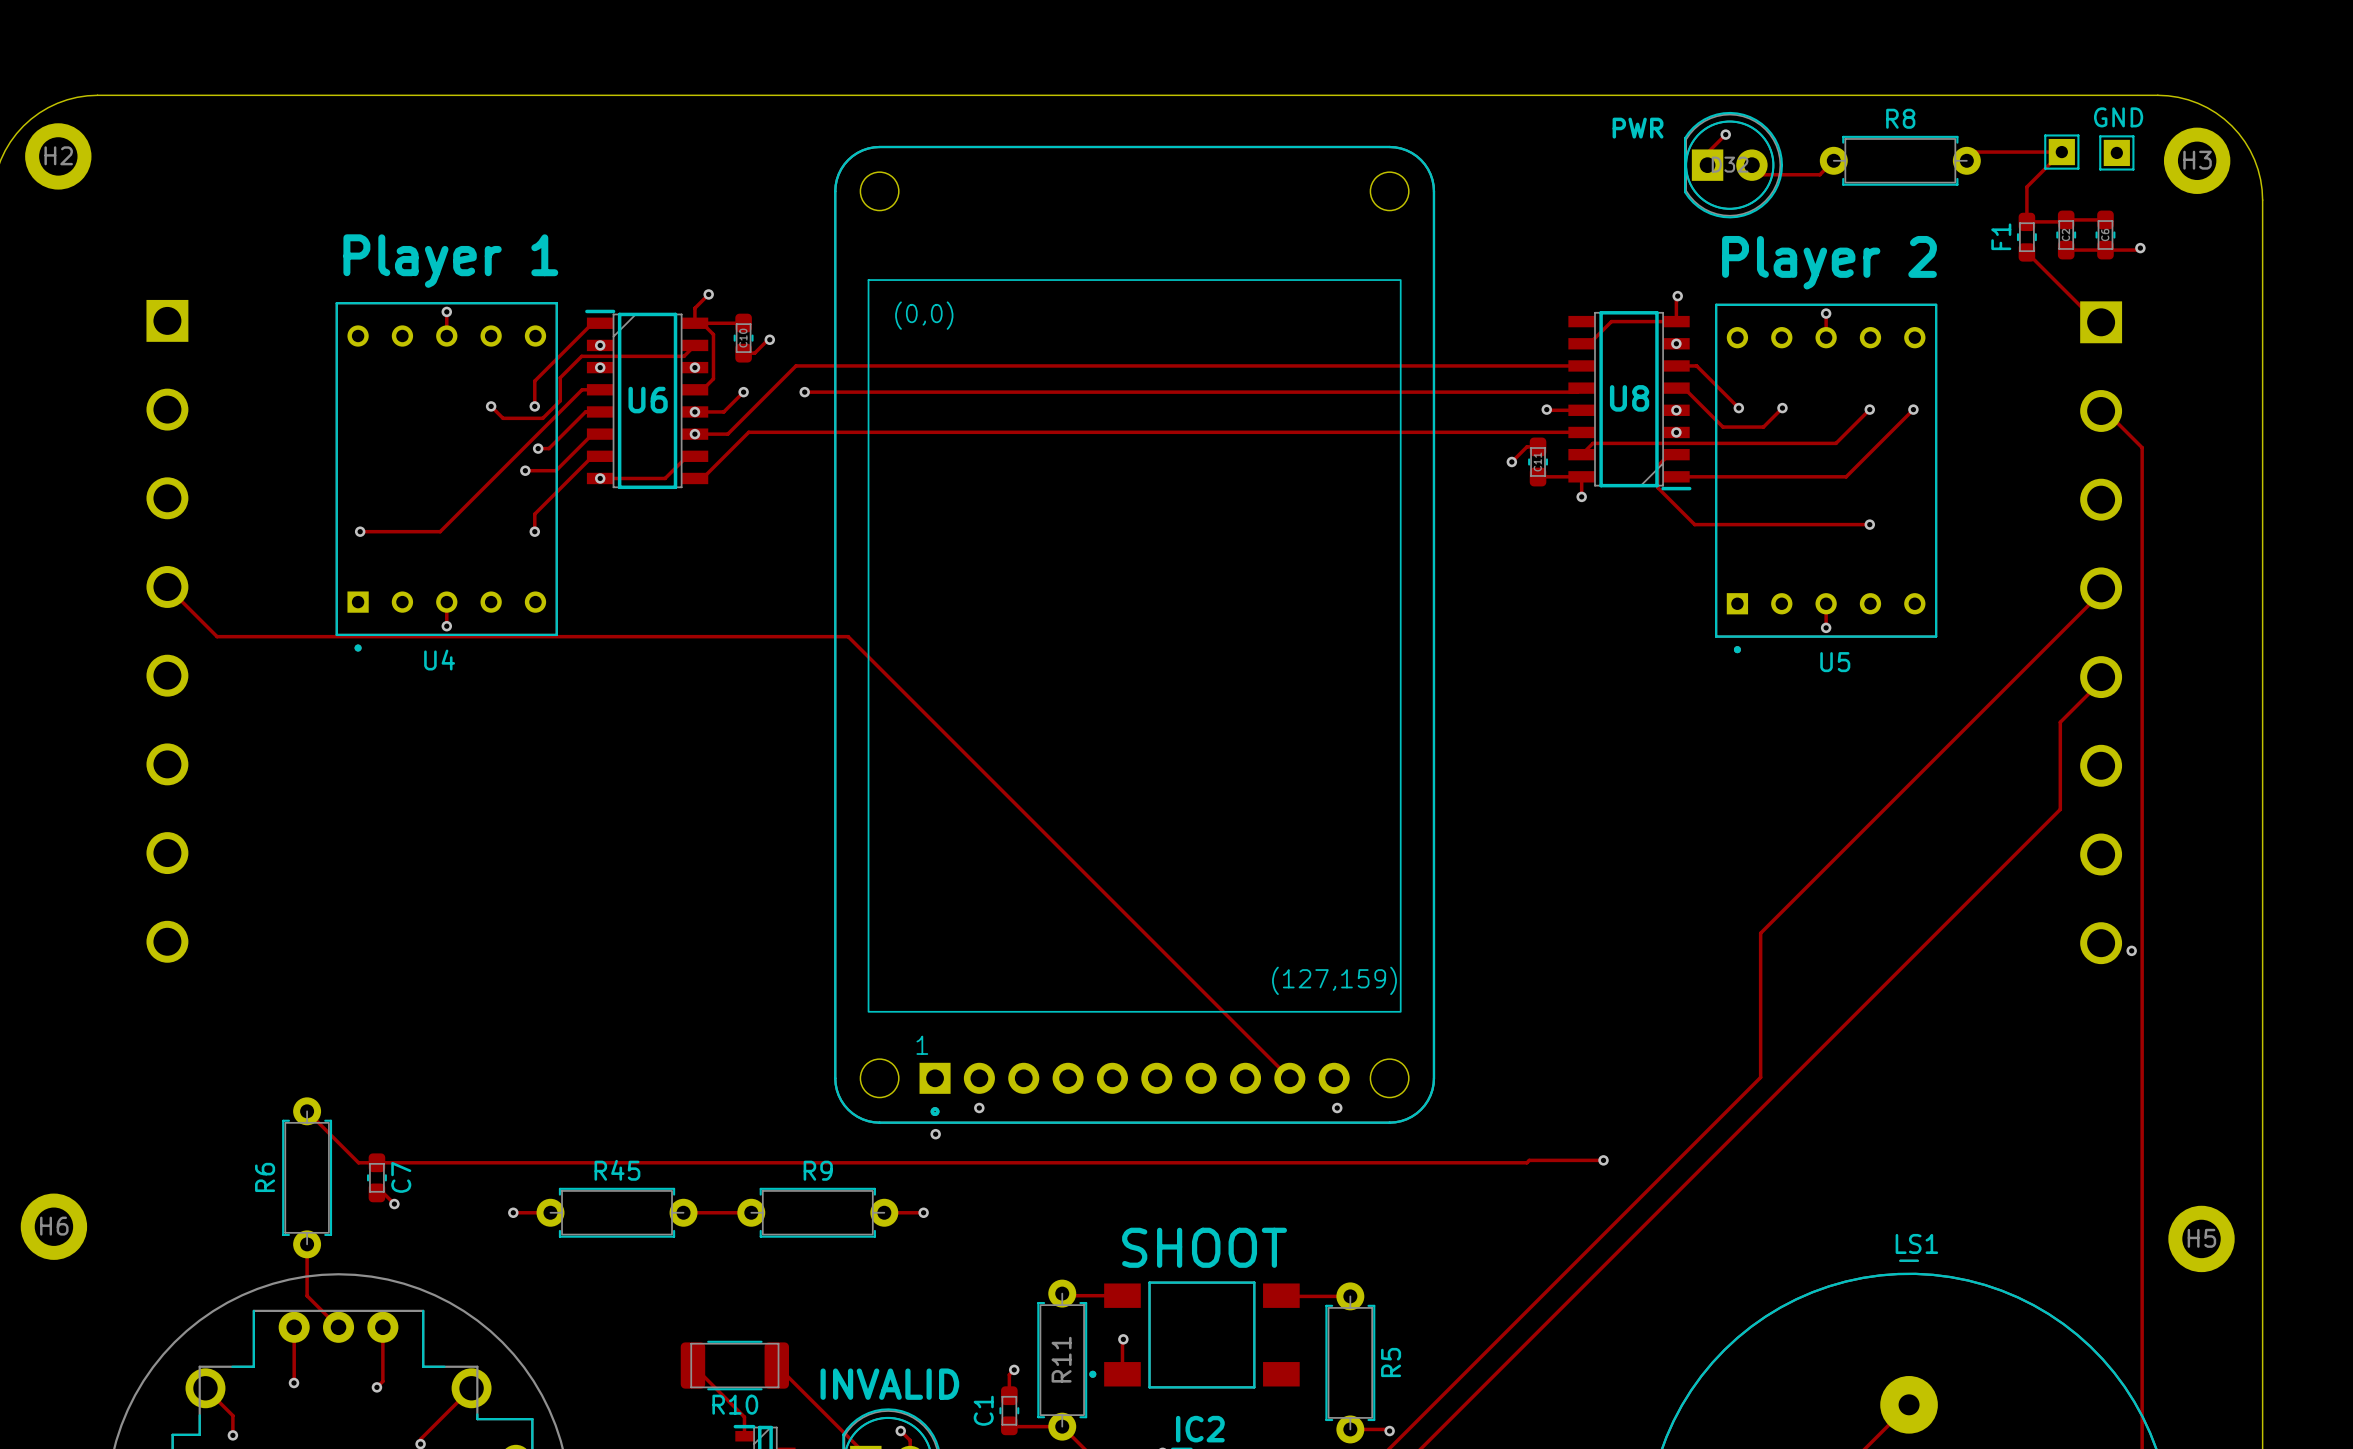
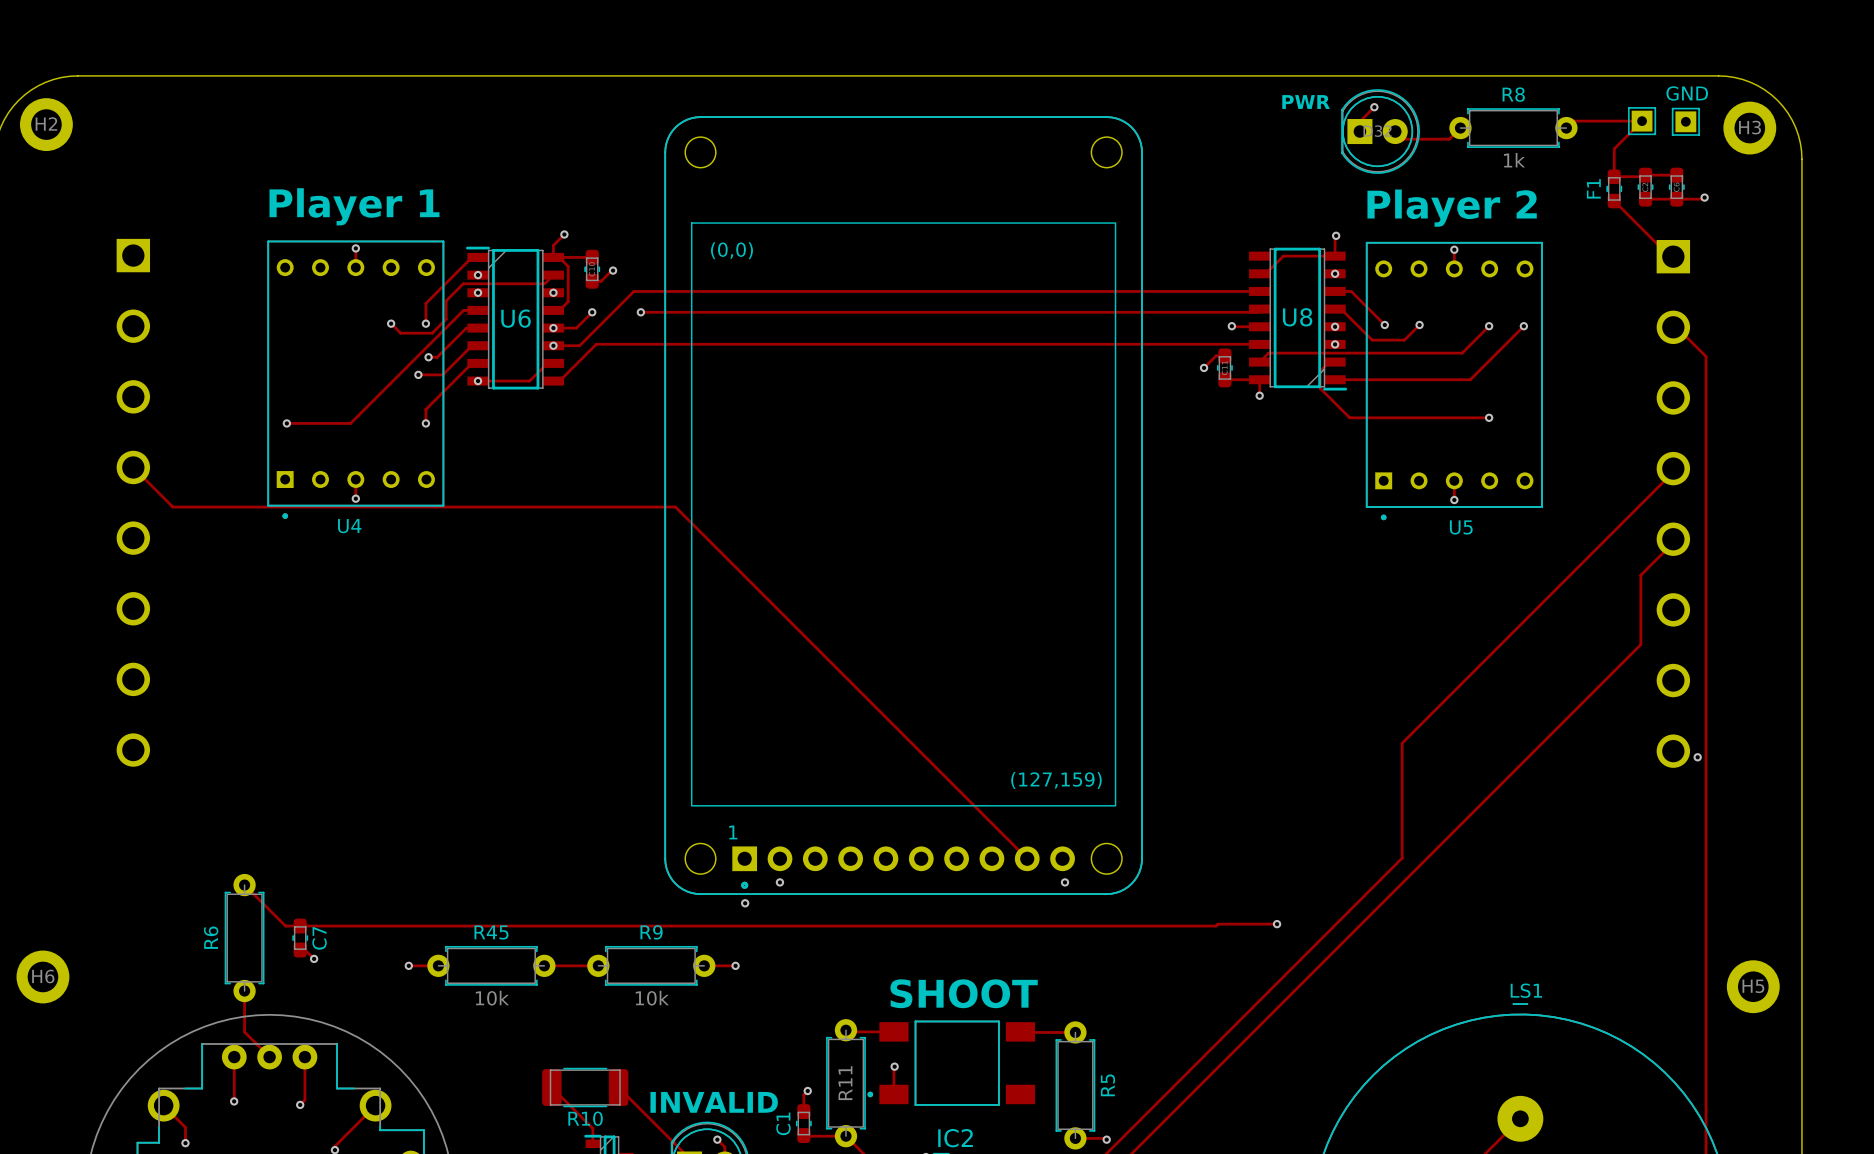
R8 value: none -> 1k (1514, 160)
R45 value: none -> 10k (492, 998)
R9 value: none -> 10k (652, 998)

